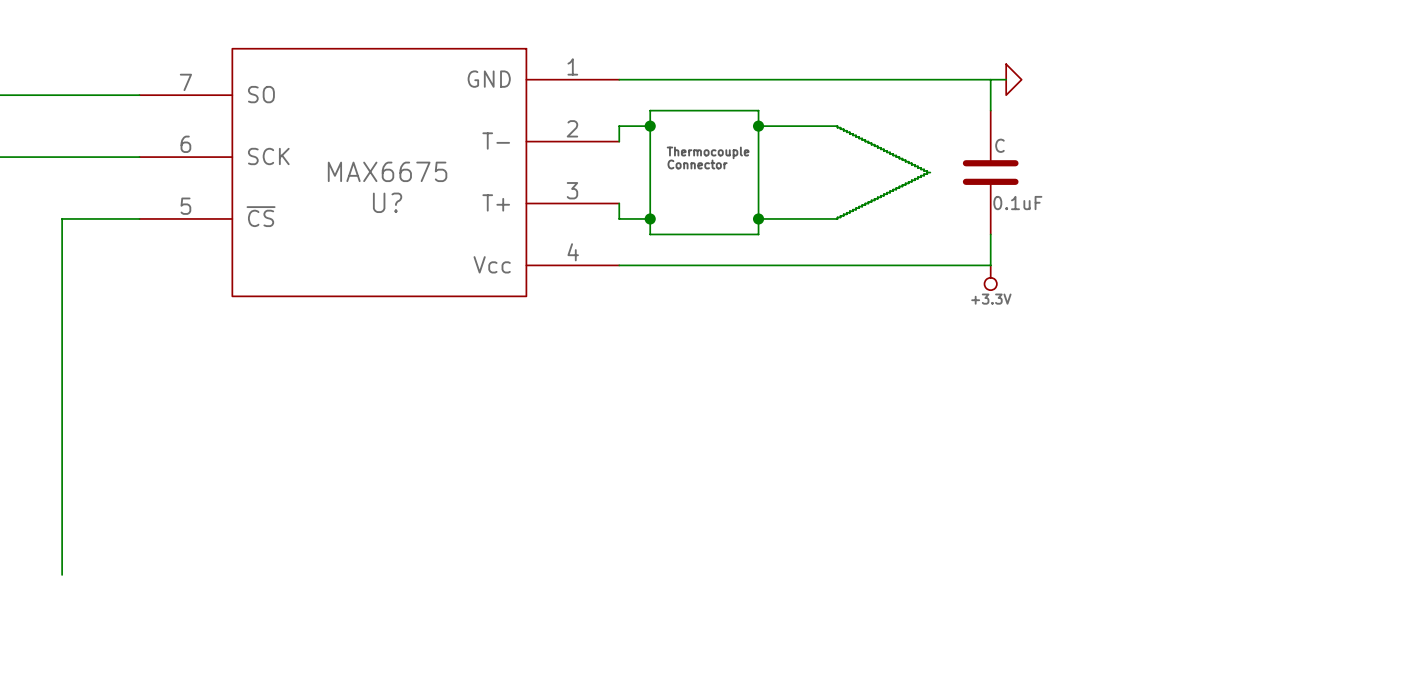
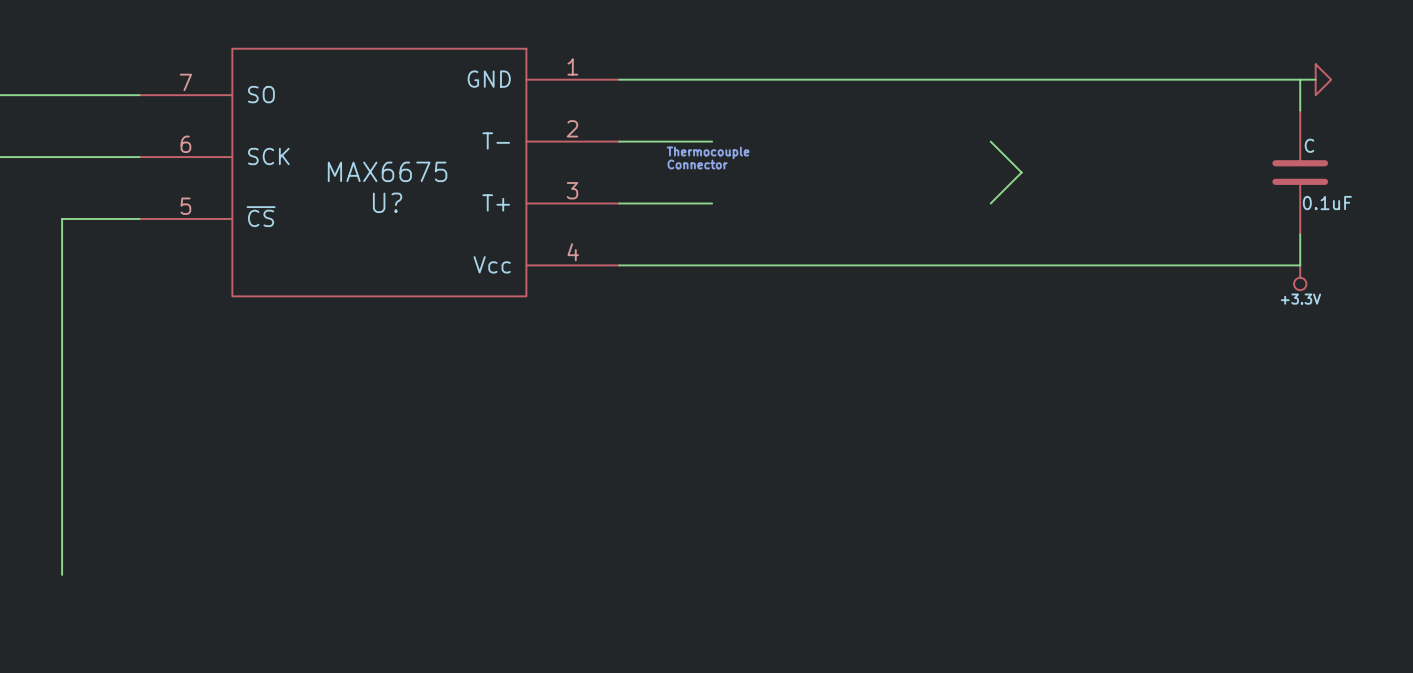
wire: (990, 79) (990, 110) -> none
wire: none -> (1006, 79) (1315, 79)
power symbol: (1013, 79) -> none
wire: none -> (1300, 79) (1300, 110)
power symbol: none -> (1323, 79)
wire: (650, 110) (758, 110) (758, 234) (650, 234) (650, 110) -> none
wire: (650, 126) (619, 126) (619, 141) -> (712, 141) (619, 141)
junction: (650, 126) -> none
wire: (758, 126) (837, 126) (927, 171) (927, 174) (837, 218) (758, 218) -> none
junction: (758, 126) -> none
wire: none -> (990, 141) (1021, 172) (990, 203)
wire: (927, 172) (930, 172) -> none
0.1uF position: (990, 172) -> (1300, 172)
wire: (619, 203) (619, 218) (650, 218) -> (619, 203) (712, 203)
junction: (650, 218) -> none
junction: (758, 218) -> none
wire: (990, 234) (990, 265) -> (1300, 234) (1300, 265) (990, 265)
power symbol: +3.3V (990, 277) -> none
power symbol: none -> +3.3V (1300, 277)

